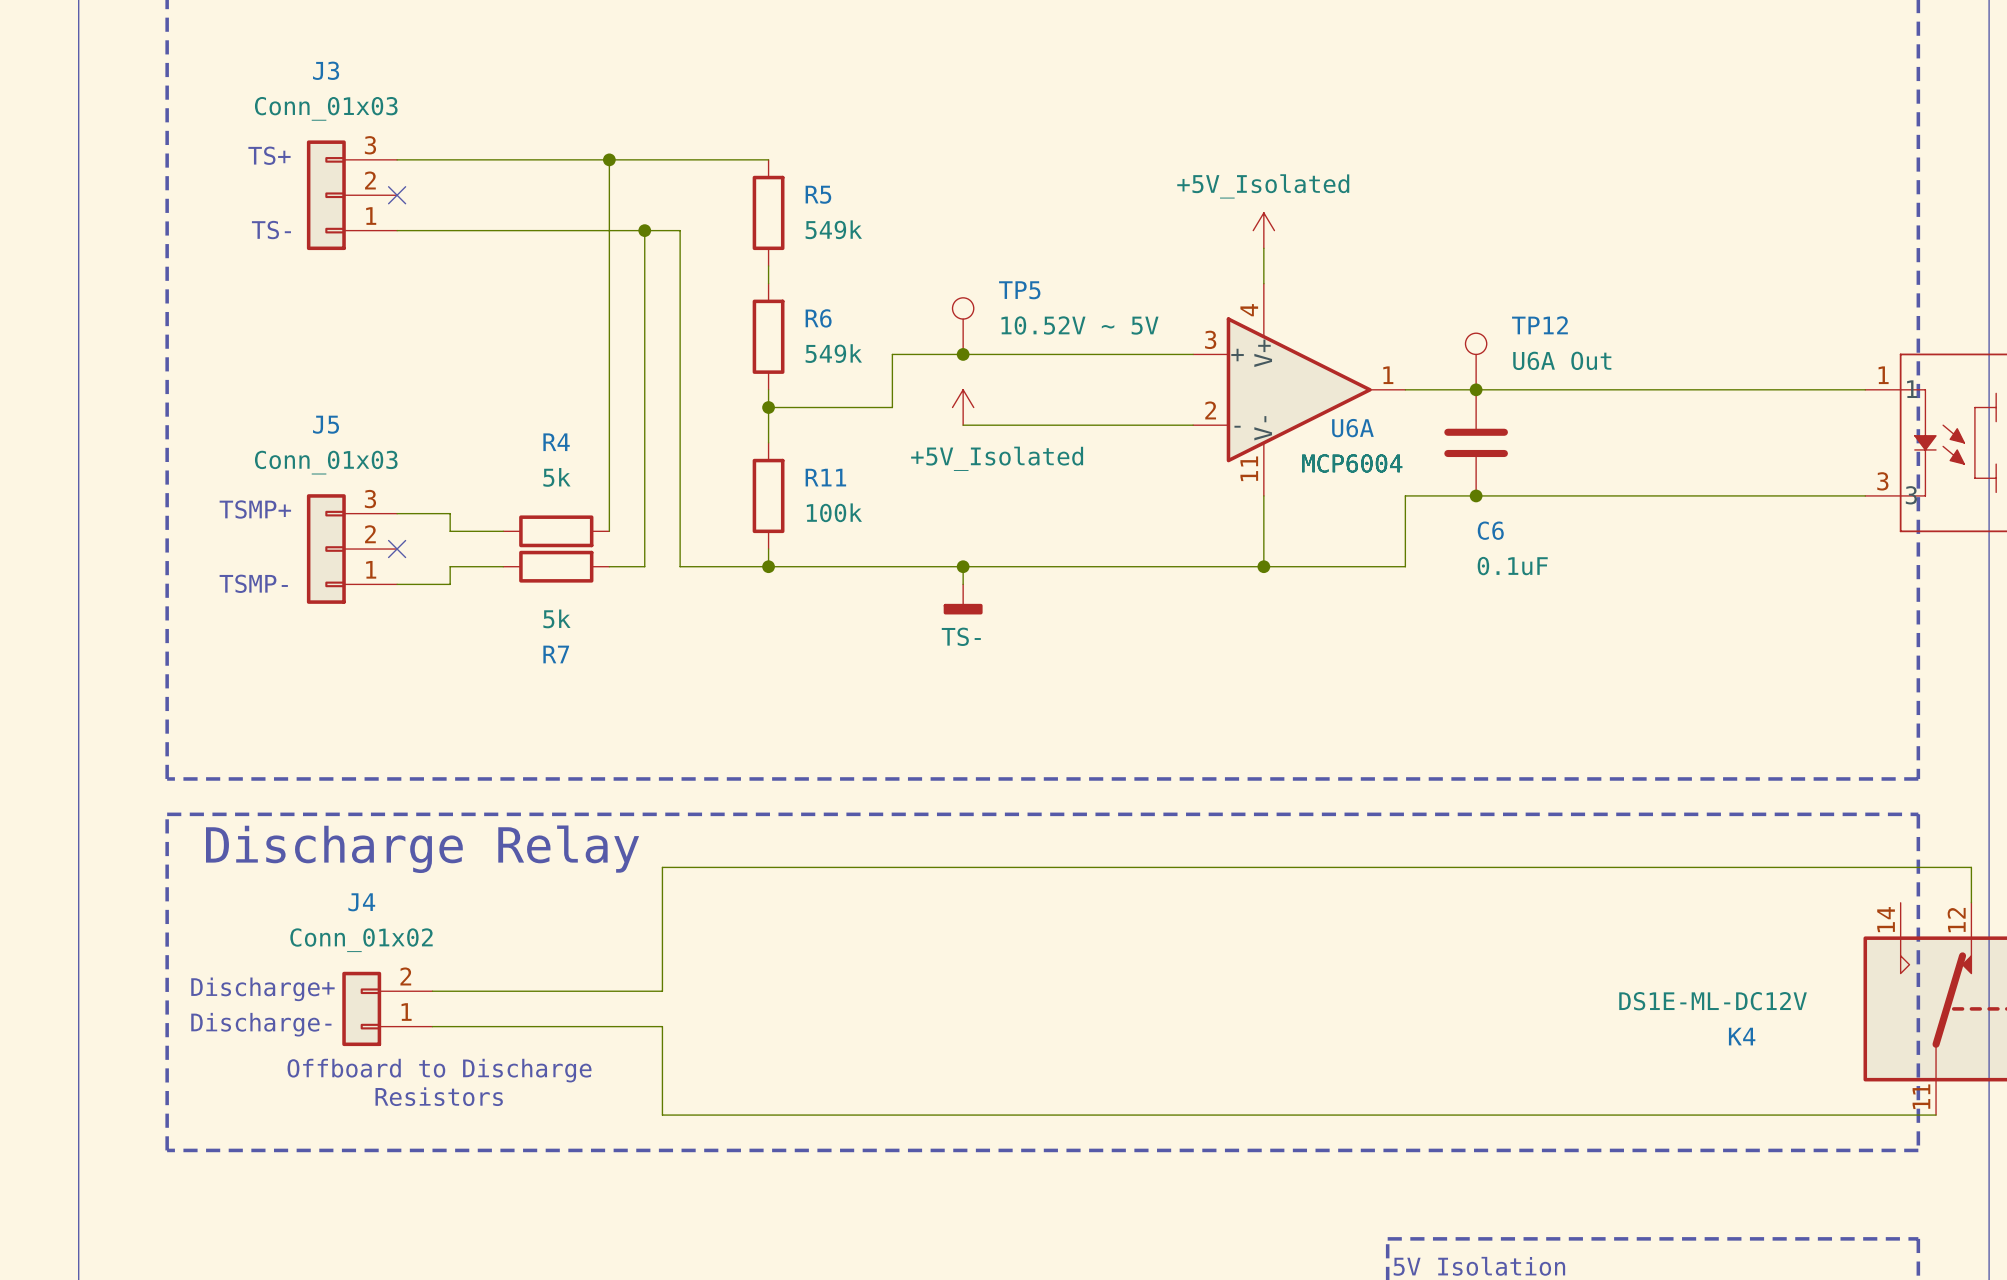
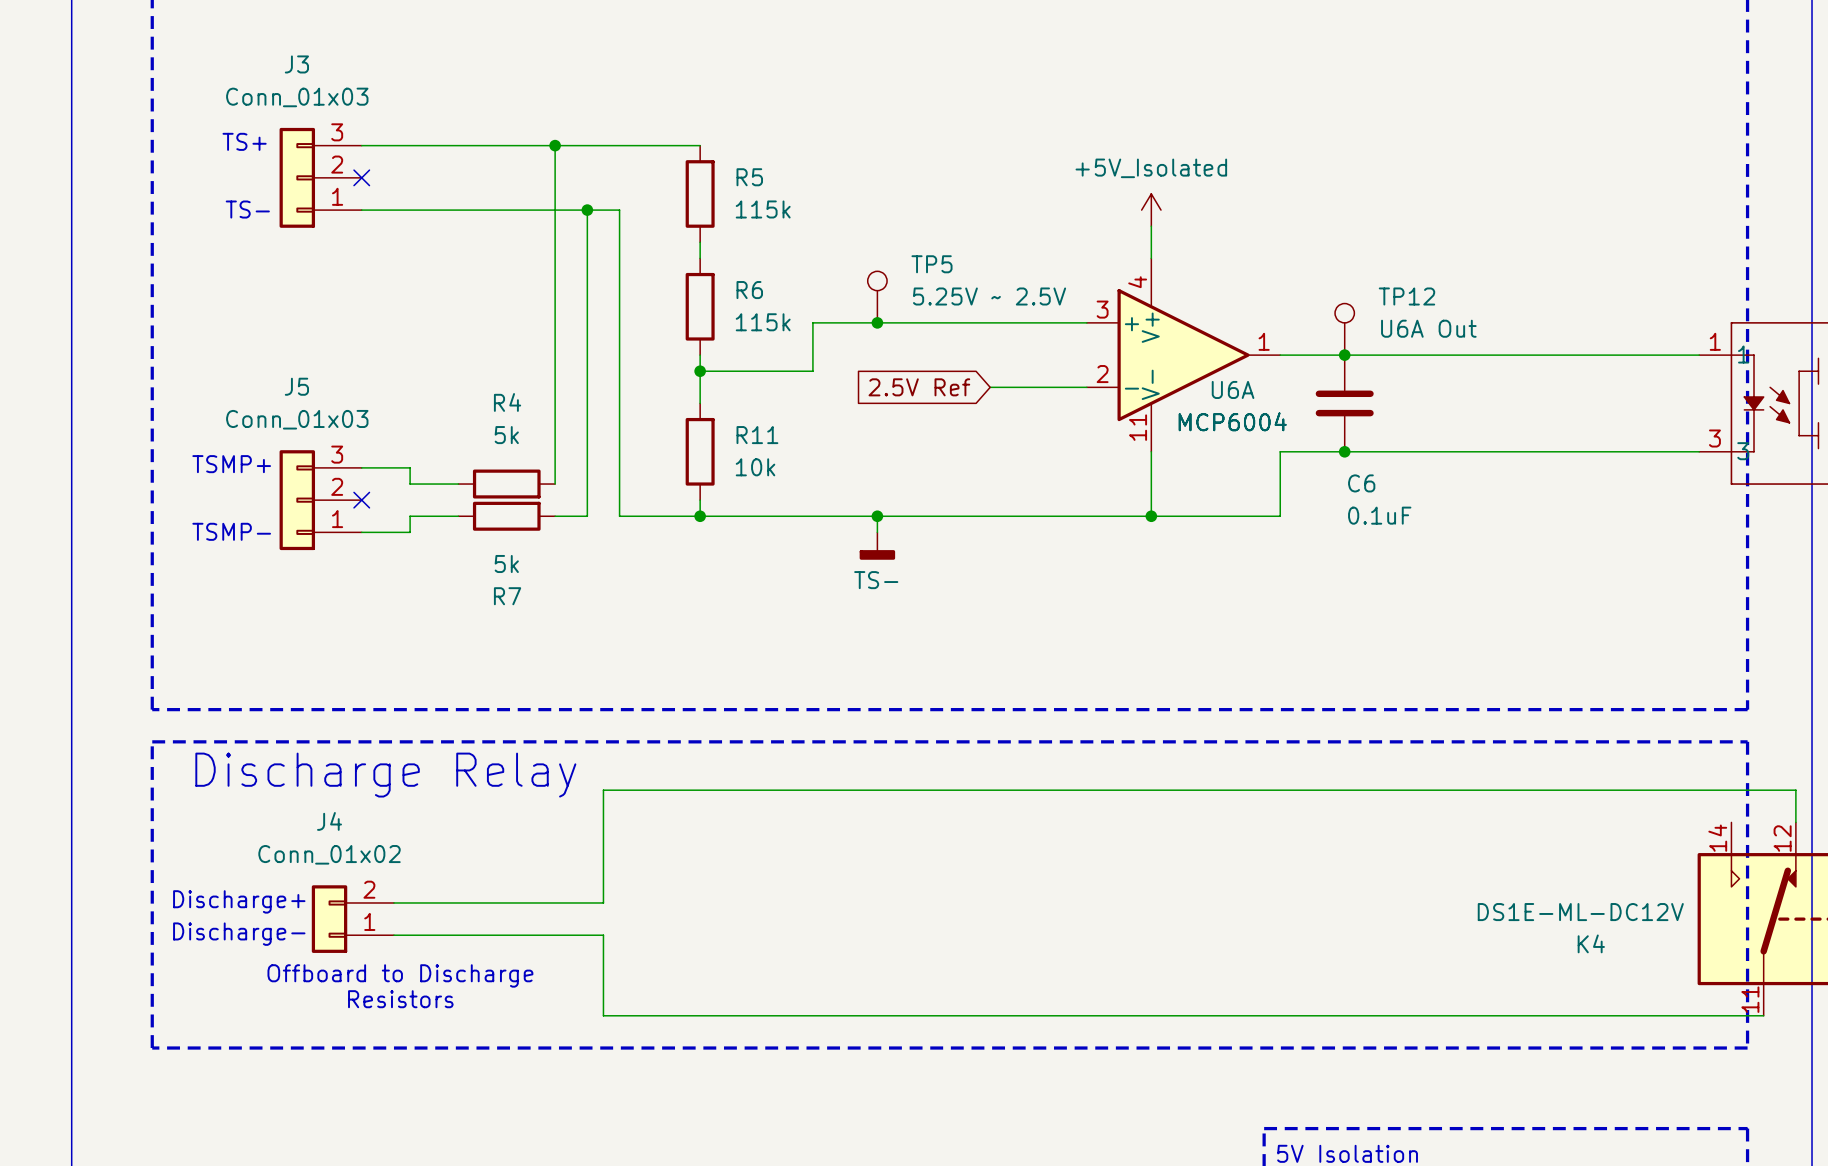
R5 value: 549k (833, 229) -> 115k (763, 209)
TP5 value: 10.52V ~ 5V (1079, 325) -> 5.25V ~ 2.5V (989, 296)
R6 value: 549k (833, 353) -> 115k (763, 322)
power symbol: +5V_Isolated (963, 407) -> none
global label: none -> 2.5V Ref (919, 387)
wire: (963, 425) (1086, 425) -> none
R11 value: 100k (834, 512) -> 10k (755, 467)

